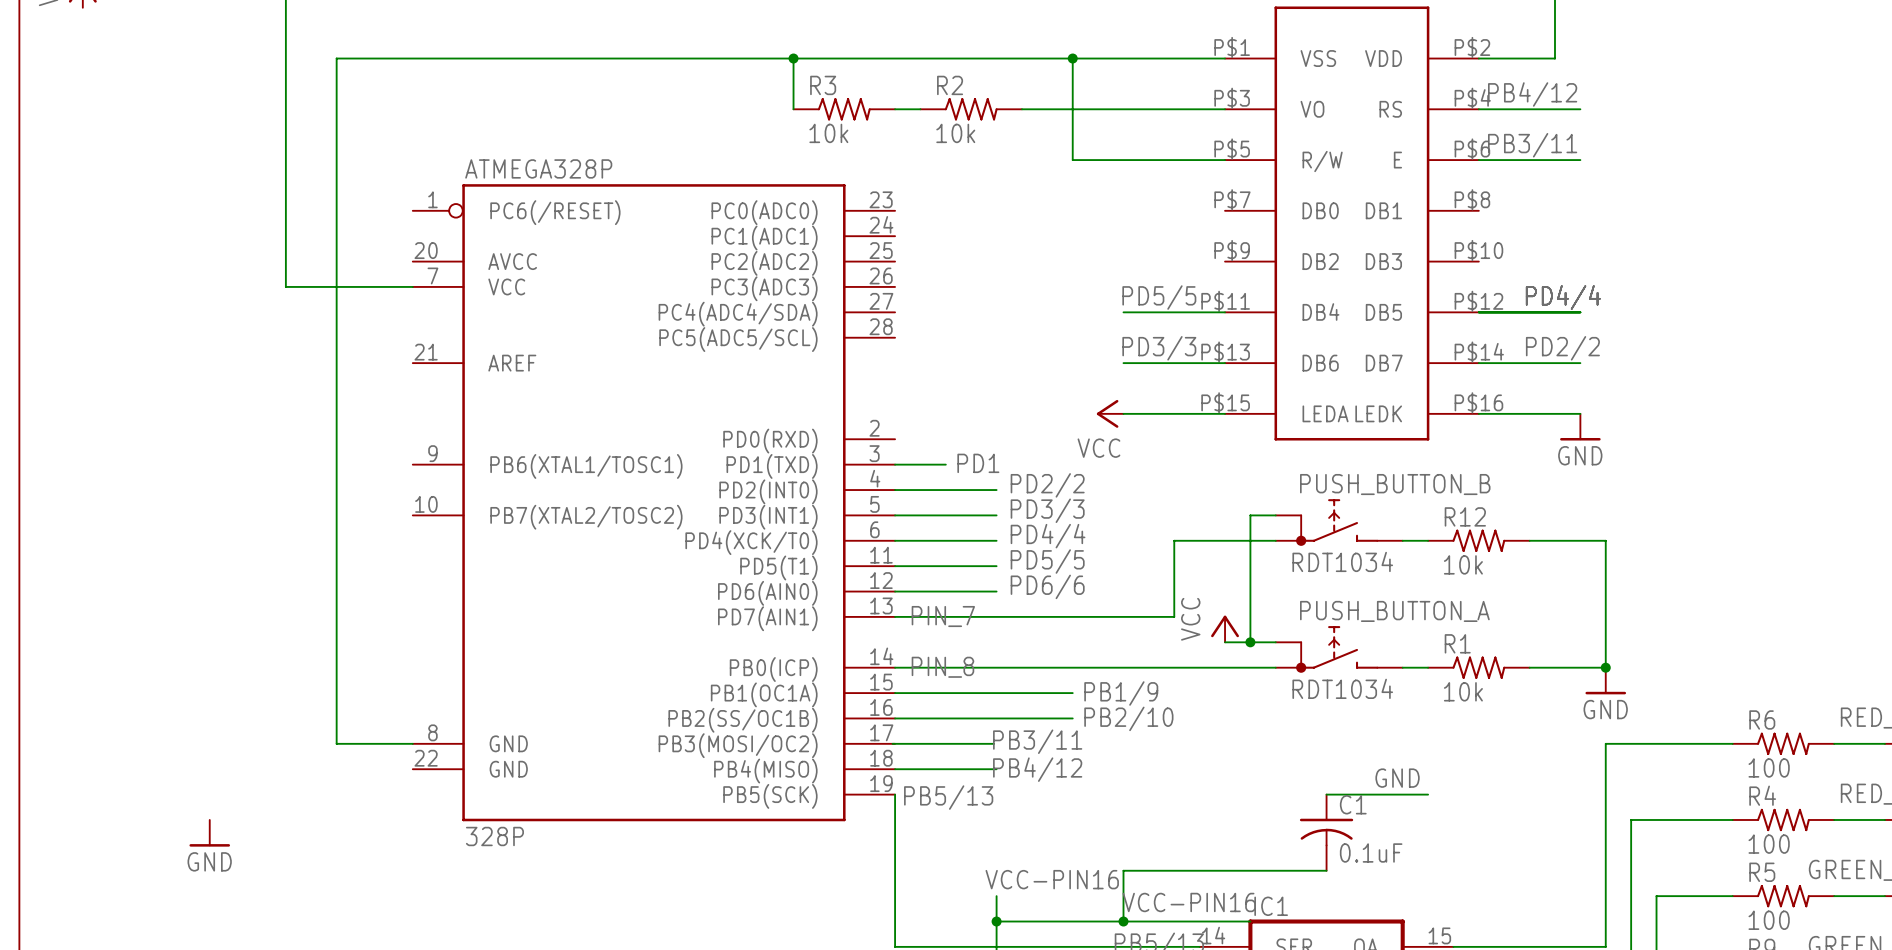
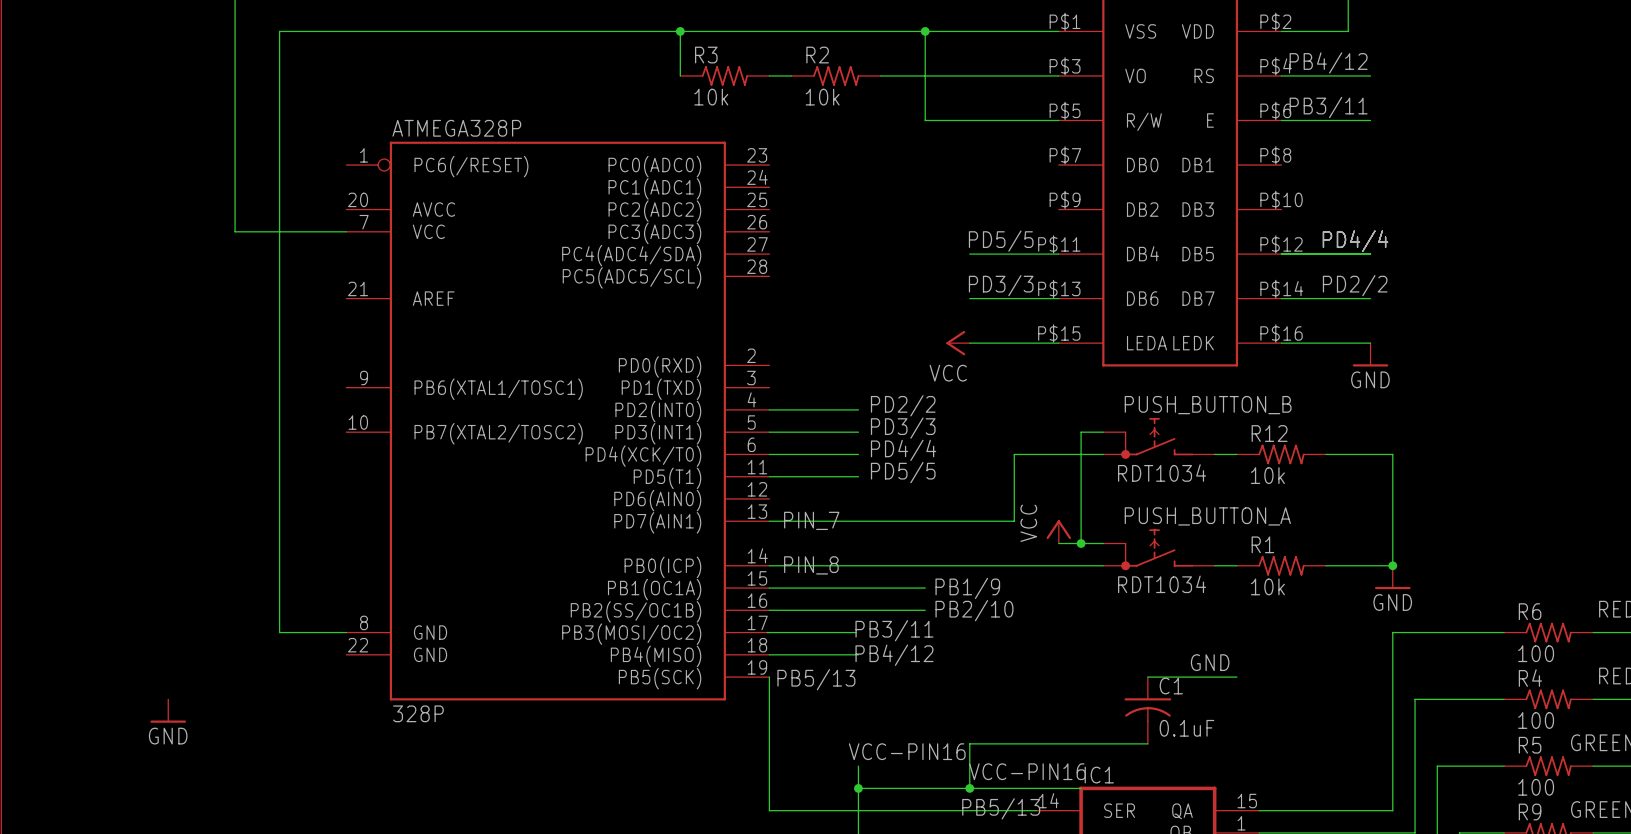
label: PD1 (978, 463) -> none
wire: (895, 464) (945, 464) -> none
label: PD6/6 (1047, 586) -> none
wire: (895, 591) (996, 591) -> none

